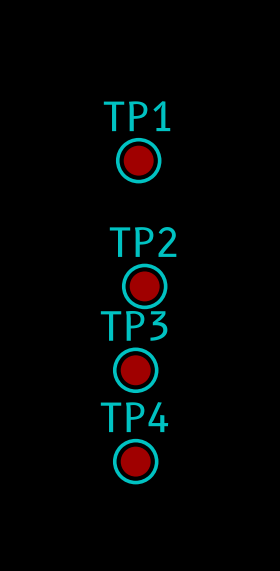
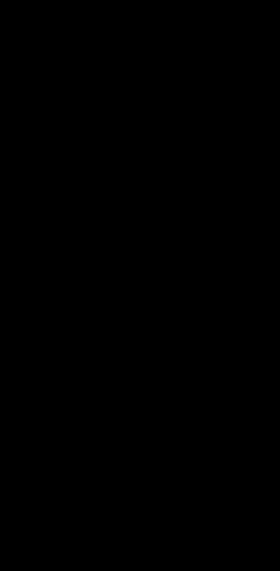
TP1: (138, 160) -> none
TP2: (144, 286) -> none
TP3: (135, 370) -> none
TP4: (135, 461) -> none

